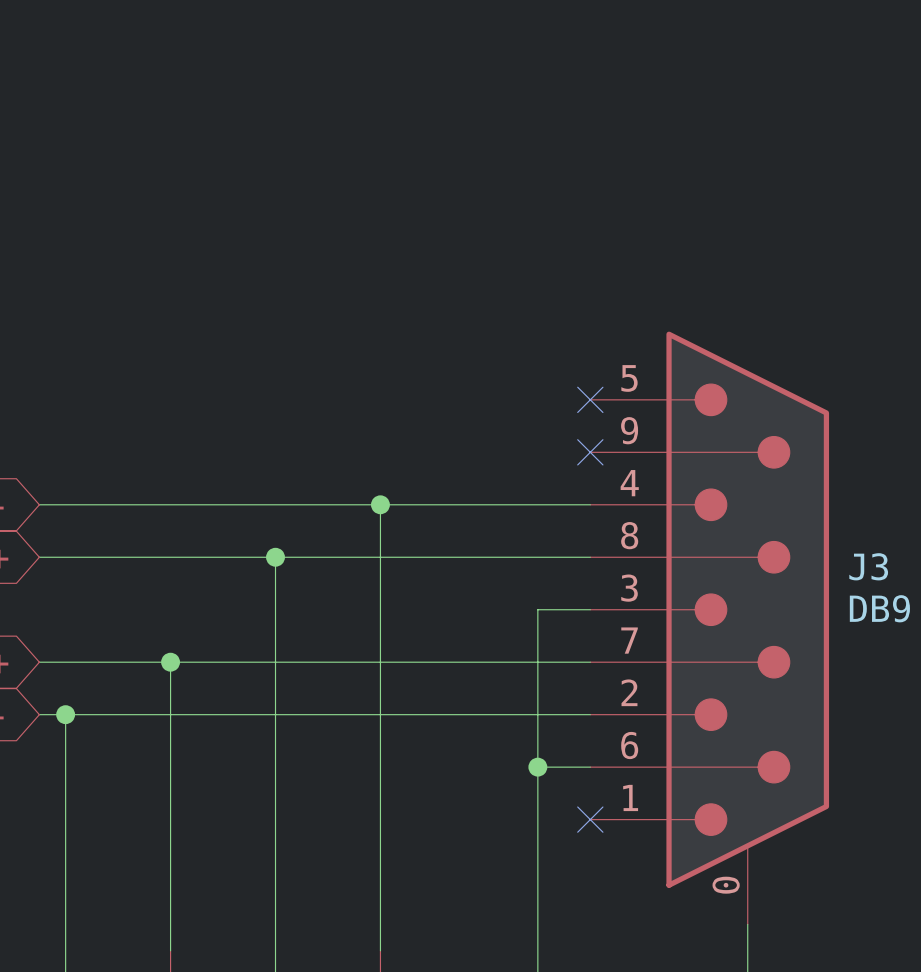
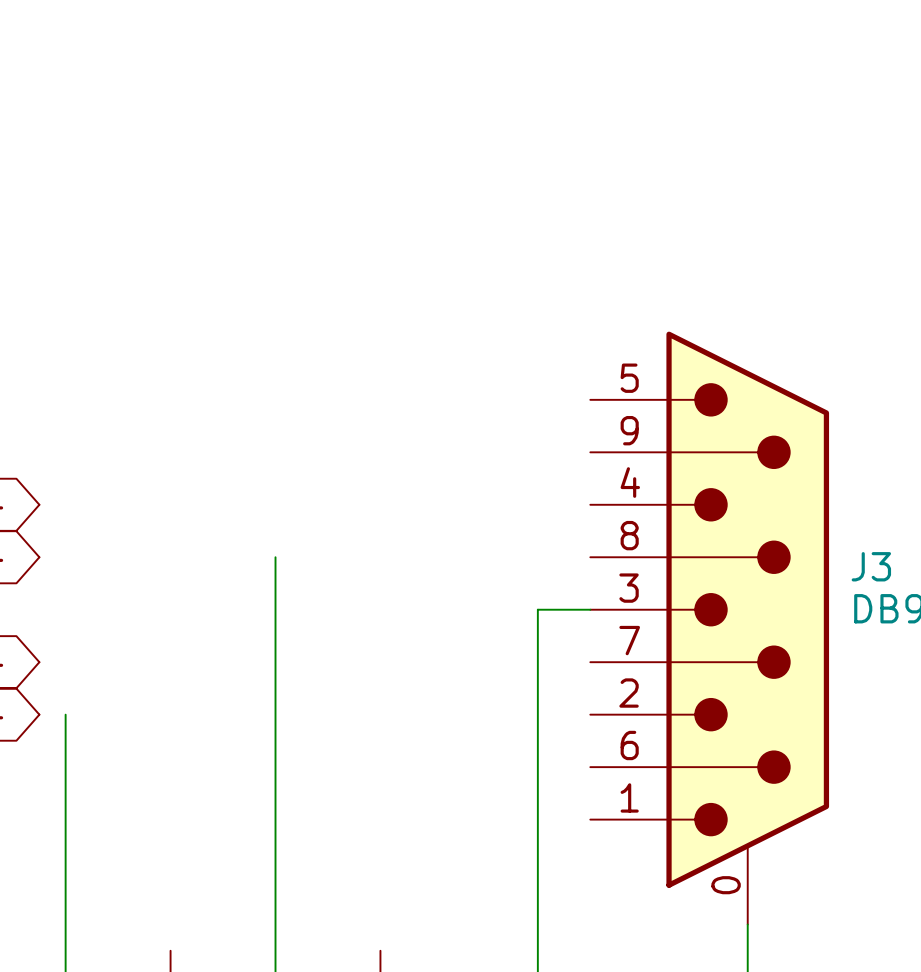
no-connect mark: (590, 399) -> none
no-connect mark: (590, 452) -> none
wire: (39, 504) (590, 504) -> none
wire: (380, 504) (380, 950) -> none
junction: (380, 504) -> none
wire: (39, 557) (590, 557) -> none
junction: (275, 557) -> none
wire: (39, 662) (590, 662) -> none
wire: (170, 662) (170, 950) -> none
junction: (170, 662) -> none
wire: (39, 714) (590, 714) -> none
junction: (65, 714) -> none
wire: (537, 767) (590, 767) -> none
junction: (537, 767) -> none
no-connect mark: (590, 819) -> none

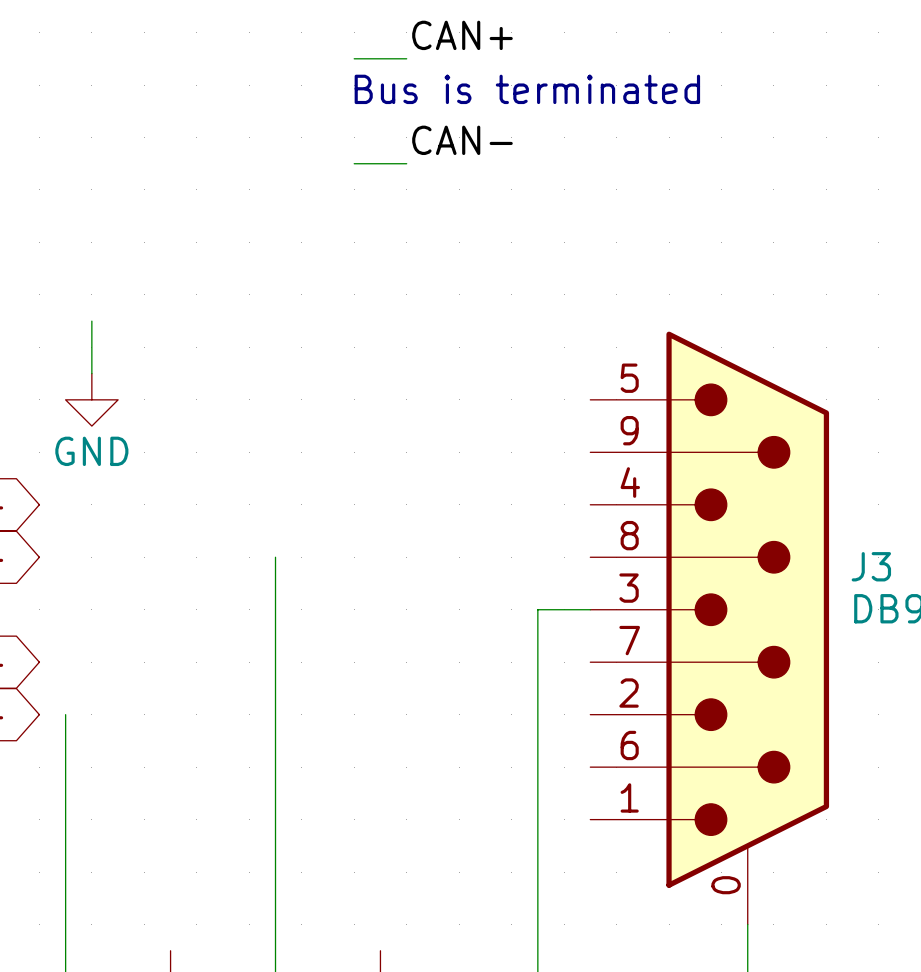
label: none -> CAN+ (462, 35)
wire: none -> (354, 58) (406, 58)
text: none -> Bus is terminated (527, 89)
label: none -> CAN- (462, 140)
wire: none -> (354, 163) (406, 163)
wire: none -> (91, 321) (91, 373)
power symbol: none -> GND (91, 399)

